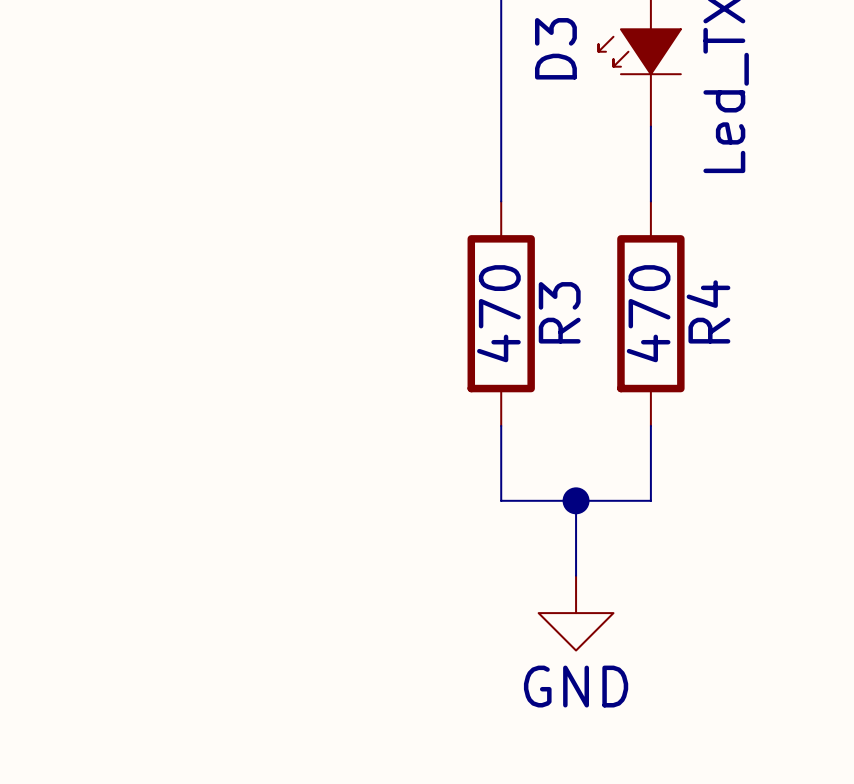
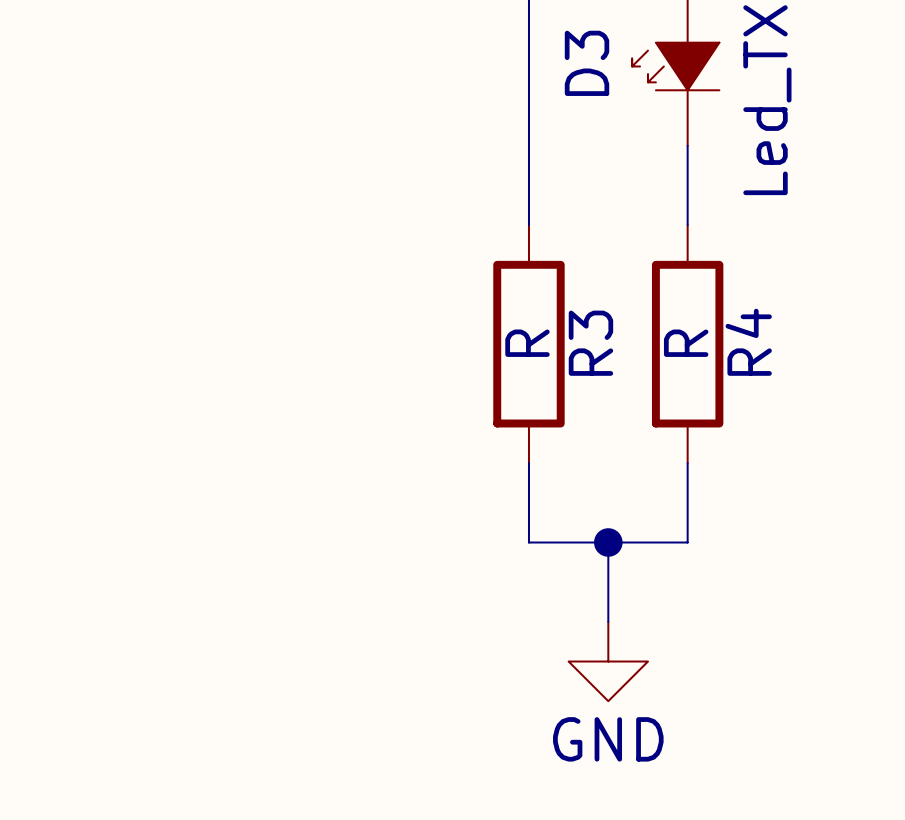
R3 value: 470 (498, 313) -> R (527, 343)
R4 value: 470 (648, 313) -> R (686, 343)

